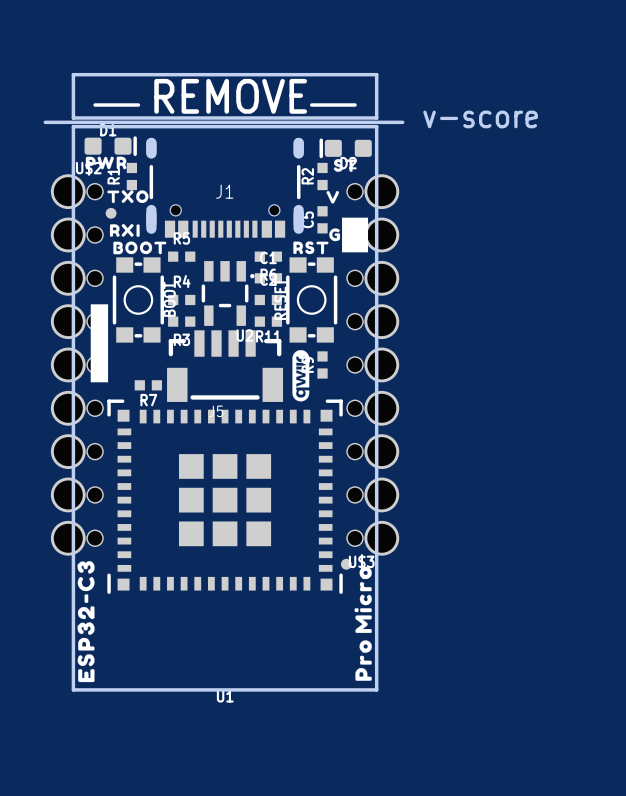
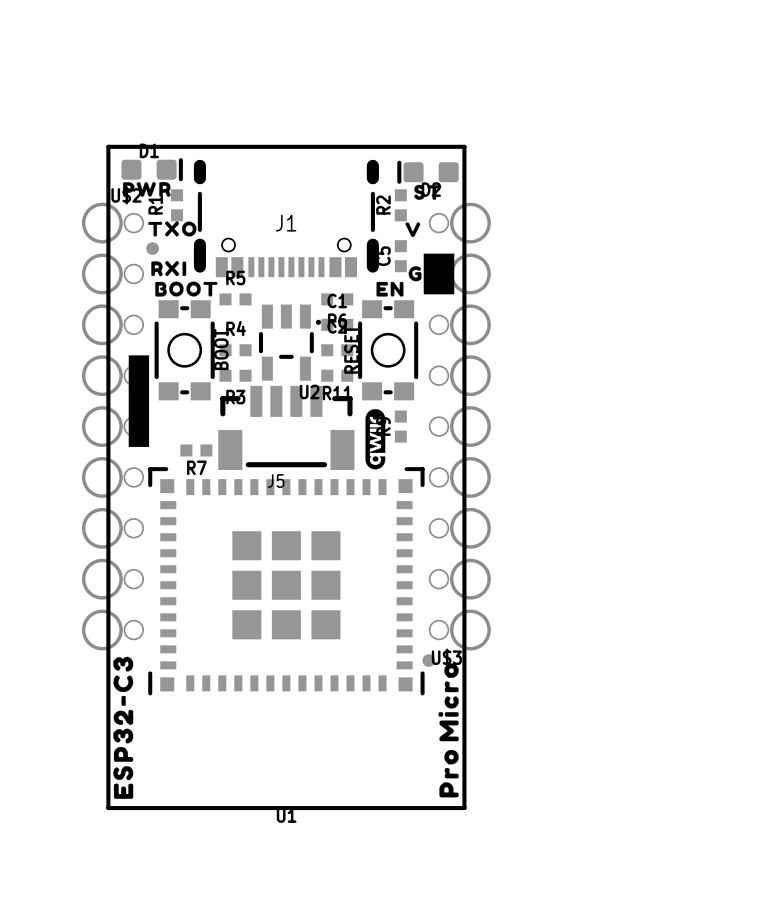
board edge: (73, 74) (376, 74) (376, 118) (73, 118) (73, 74) -> none
text: REMOVE (230, 96) -> none
line: (95, 105) (138, 105) -> none
line: (311, 105) (355, 105) -> none
text: v-score (480, 119) -> none
board edge: (45, 122) (402, 122) -> none
drawing shape: [293, 241, 329, 255] -> [376, 281, 404, 297]

